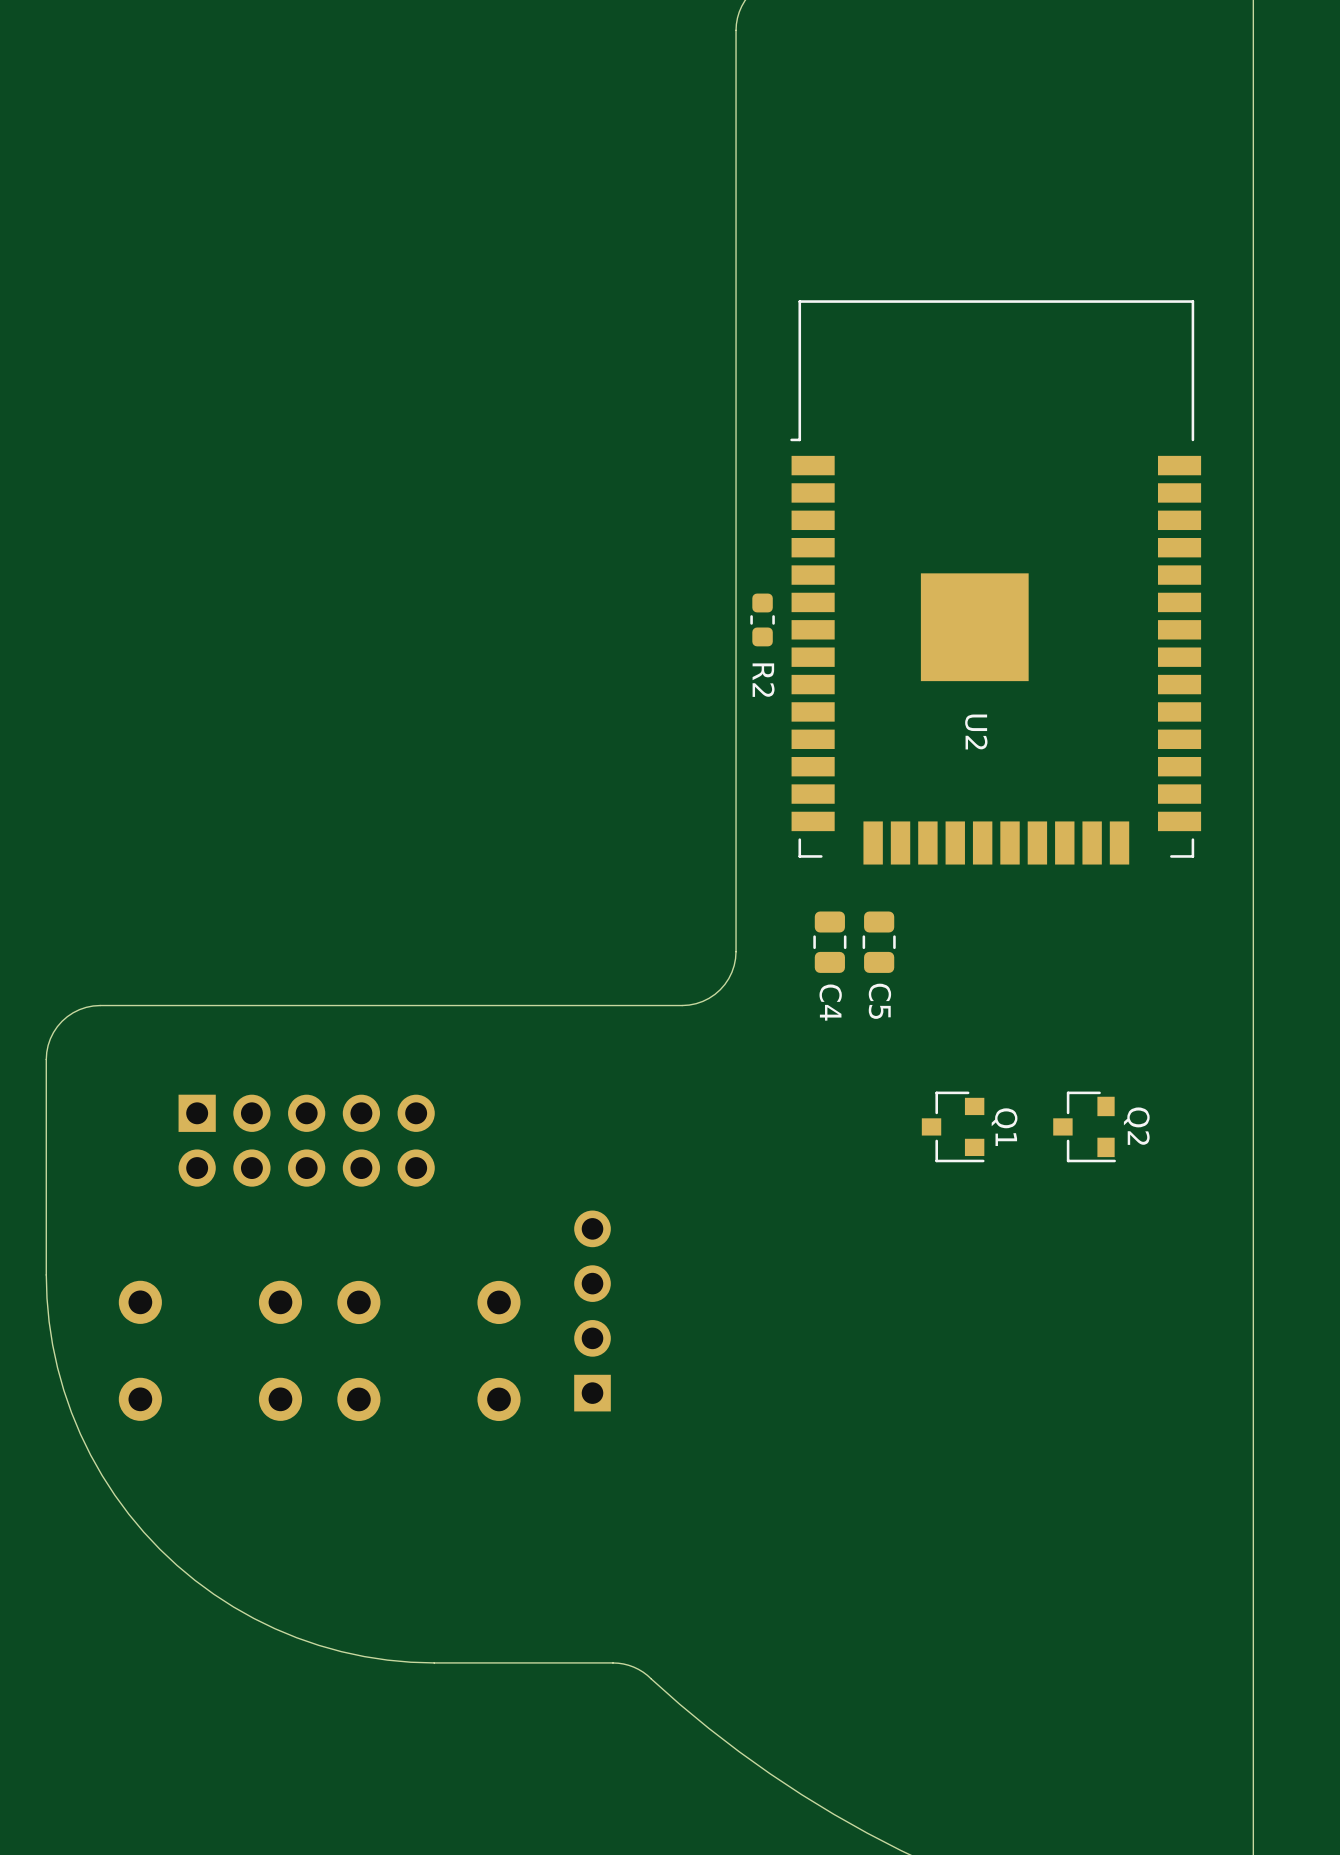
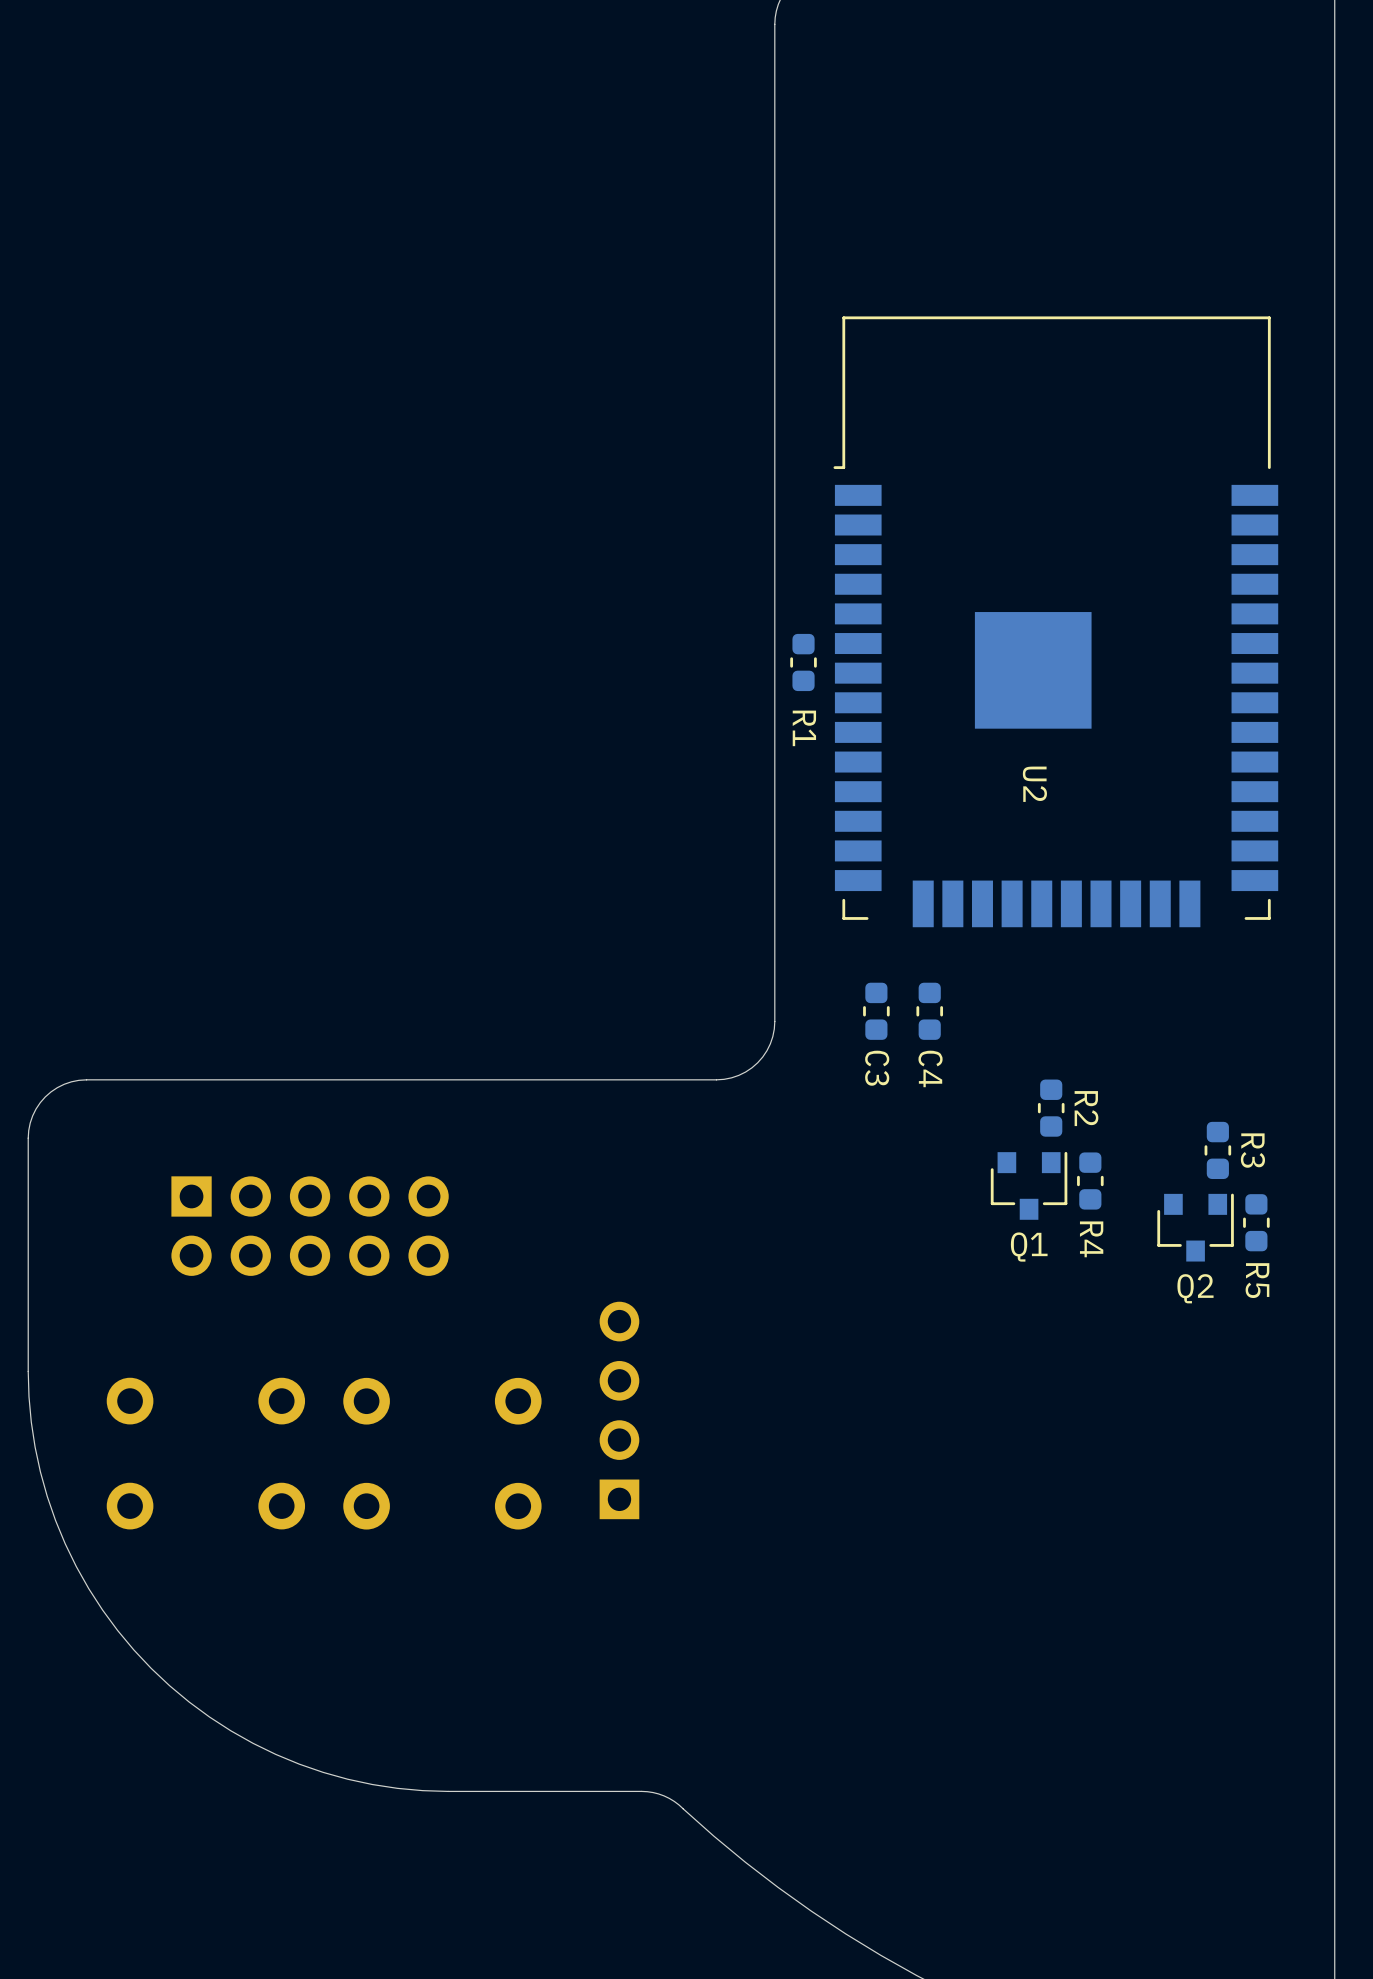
R2 name: R2 (763, 680) -> R1 (804, 728)
C4 footprint: [813, 911, 847, 973] -> [916, 982, 944, 1040]
C3: none -> (876, 1011)
C5: (879, 942) -> none
R2: none -> (1051, 1108)
R3: none -> (1217, 1150)
Q2 footprint: [1053, 1091, 1116, 1163] -> [1157, 1193, 1234, 1262]
R4: none -> (1090, 1181)
Q1 rotation: 0° (953, 1126) -> 90° counterclockwise (1029, 1185)
Q2 name position: Q2 (1136, 1126) -> Q2 (1195, 1288)
Q1 name position: Q1 (1004, 1127) -> Q1 (1029, 1247)
R5: none -> (1256, 1222)

